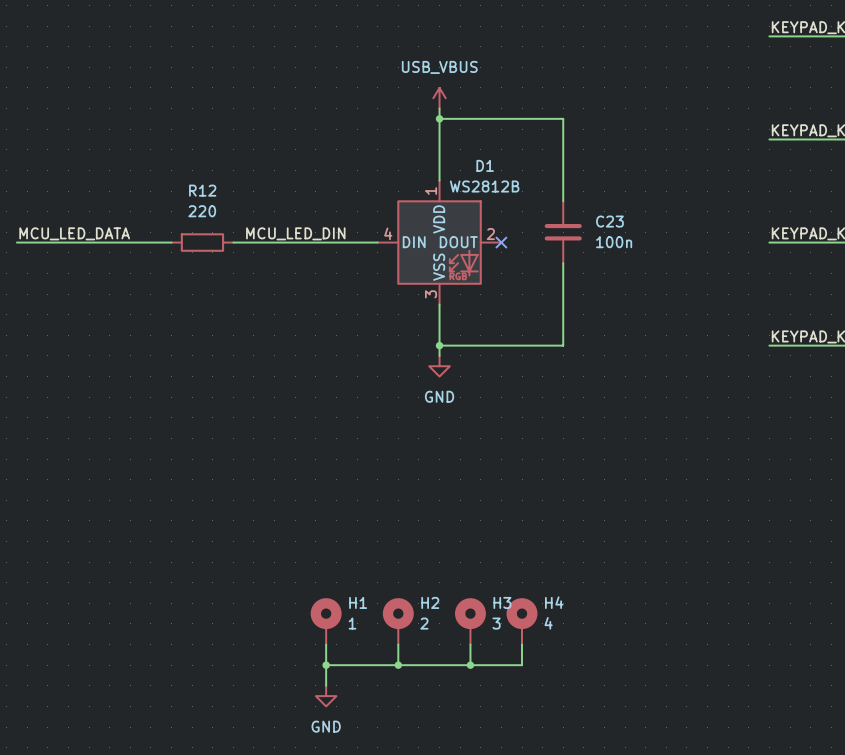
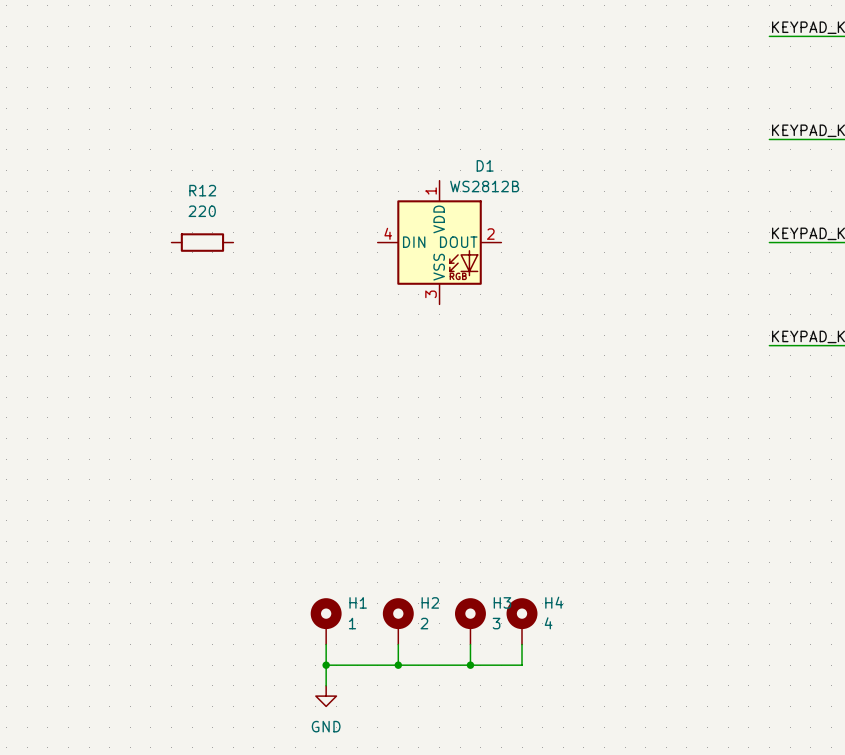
power symbol: USB_VBUS (439, 98) -> none
wire: (439, 108) (439, 180) -> none
wire: (439, 118) (563, 118) (563, 201) -> none
junction: (439, 118) -> none
C23: 100n (563, 232) -> none
label: MCU_LED_DATA (74, 233) -> none
label: MCU_LED_DIN (295, 233) -> none
wire: (16, 242) (171, 242) -> none
wire: (233, 242) (377, 242) -> none
no-connect mark: (501, 242) -> none
wire: (563, 263) (563, 345) (439, 345) -> none
wire: (439, 304) (439, 355) -> none
junction: (439, 345) -> none
power symbol: GND (439, 366) -> none

